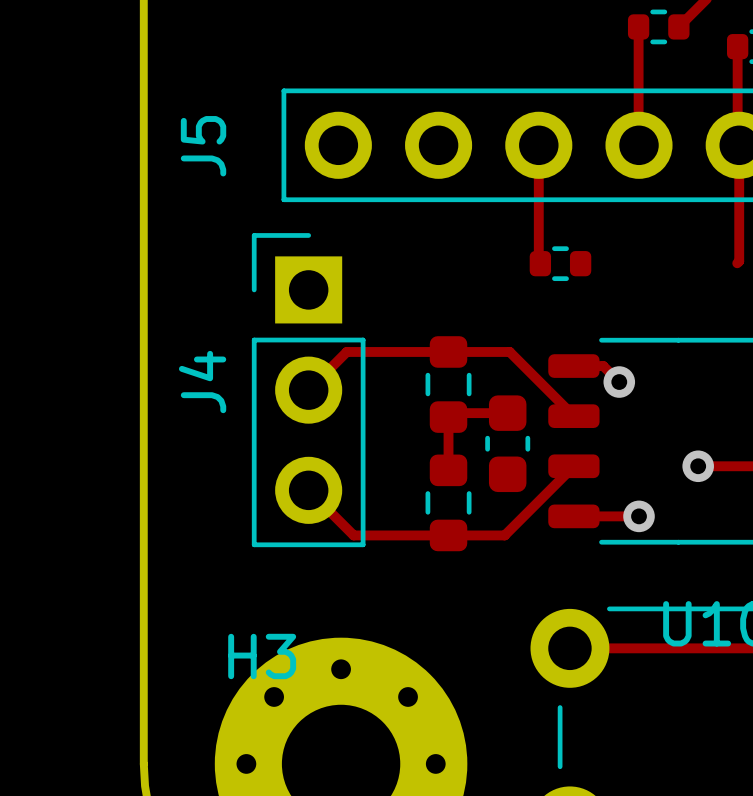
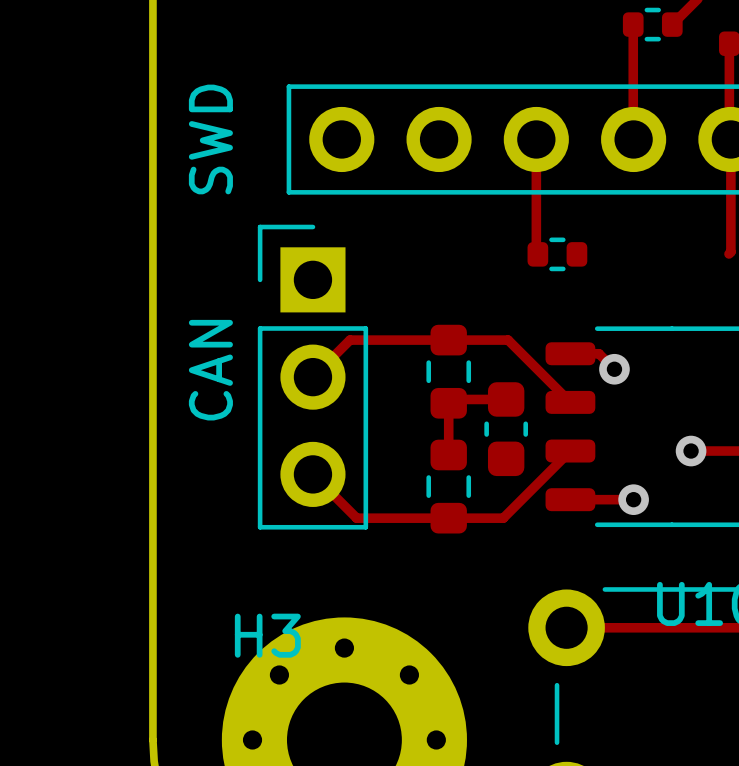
J5 name: J5 (203, 146) -> SWD (210, 139)
J4 name: J4 (202, 382) -> CAN (210, 370)

